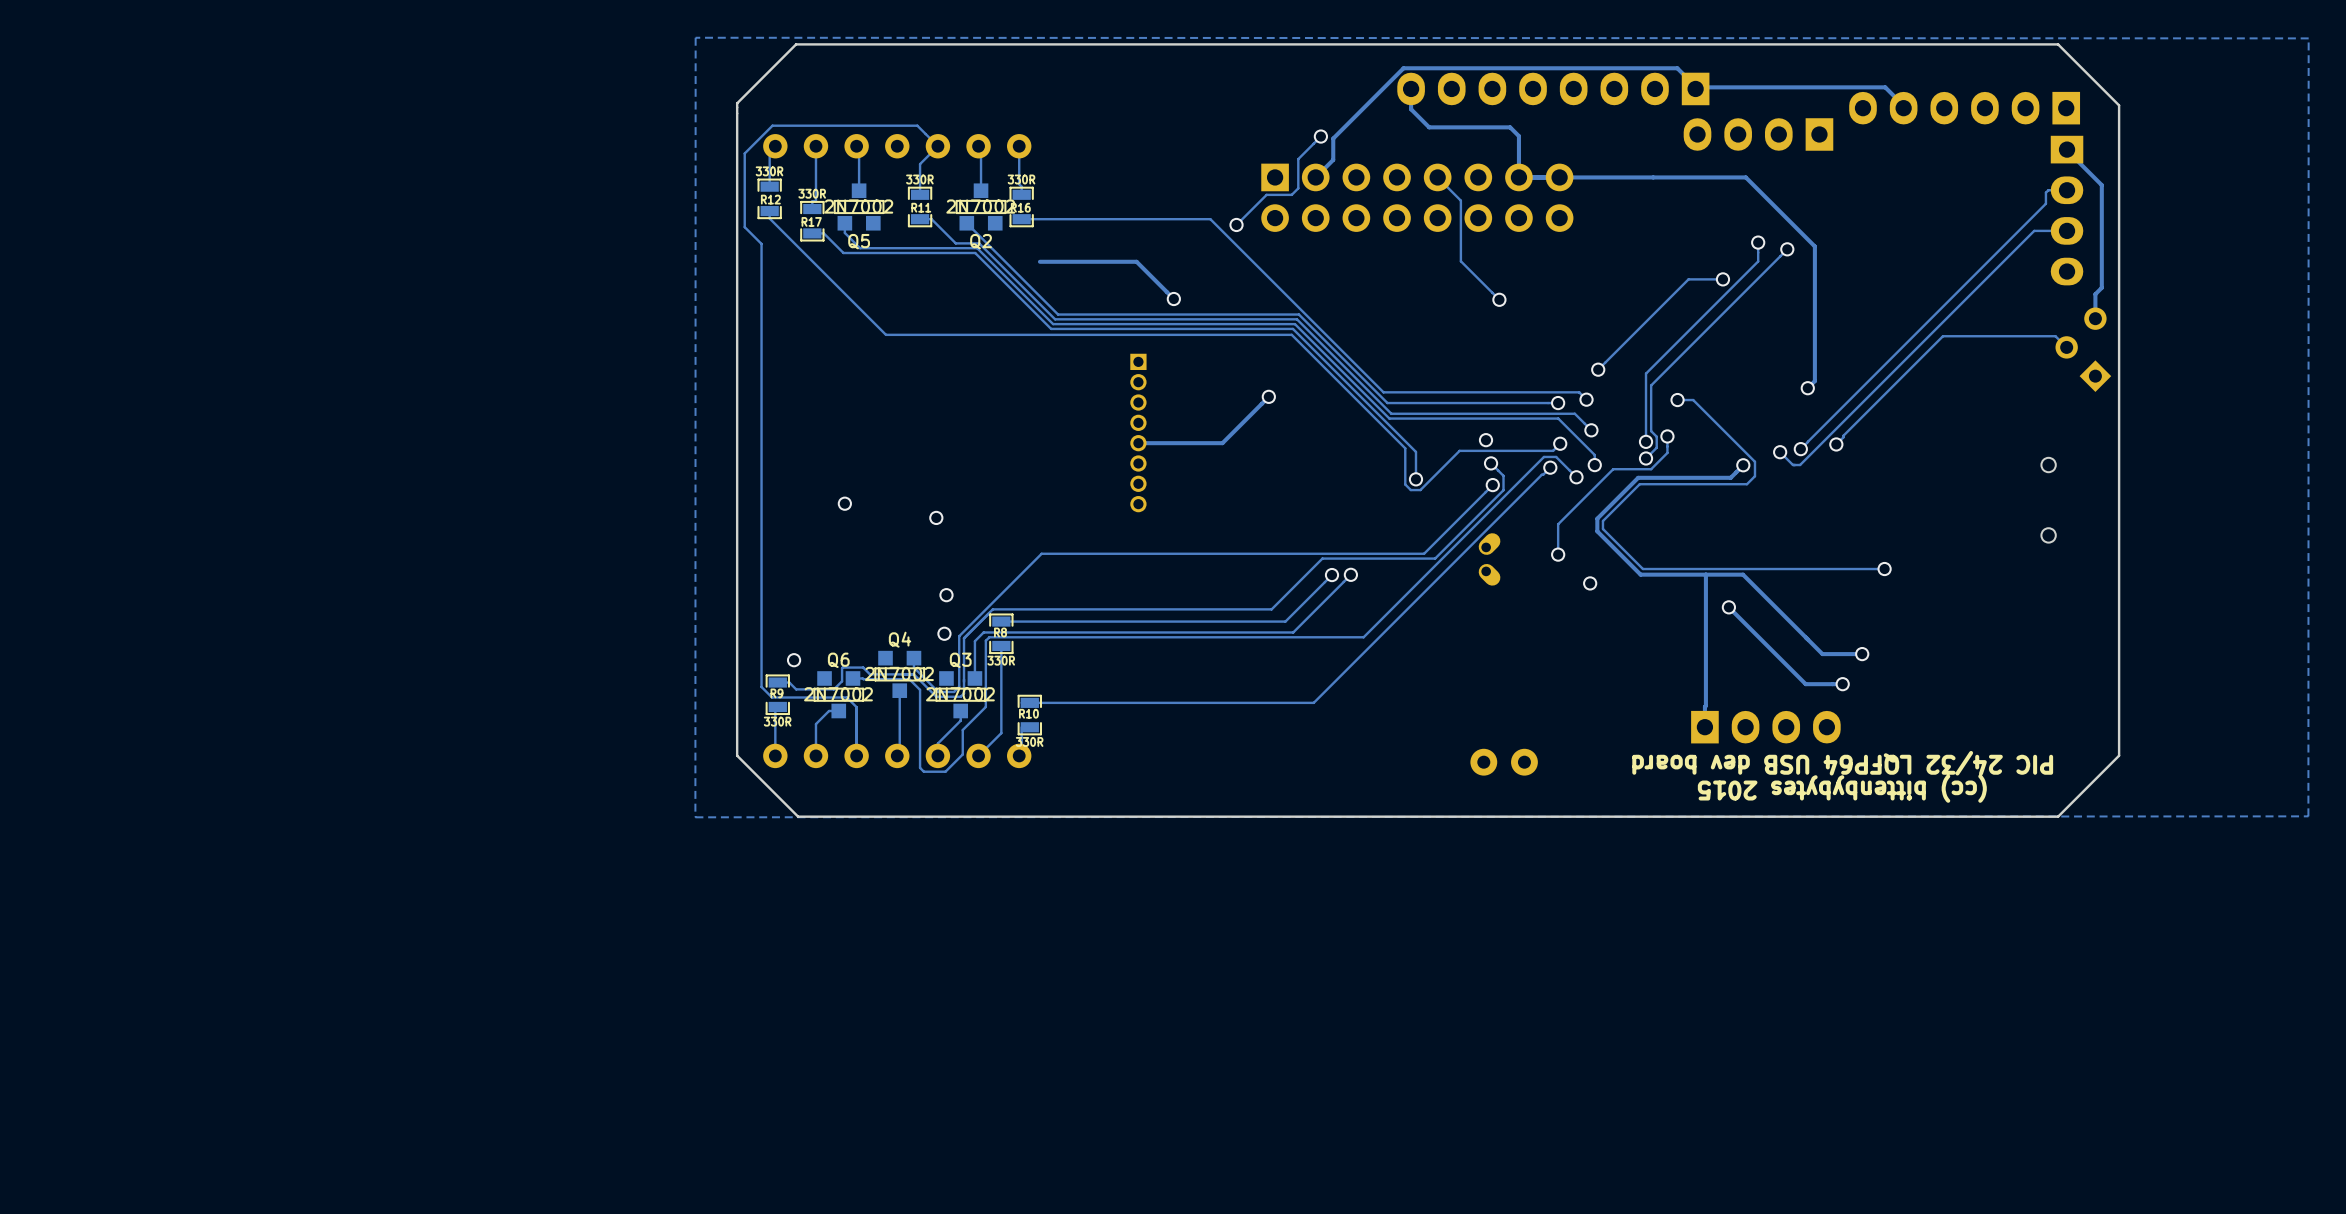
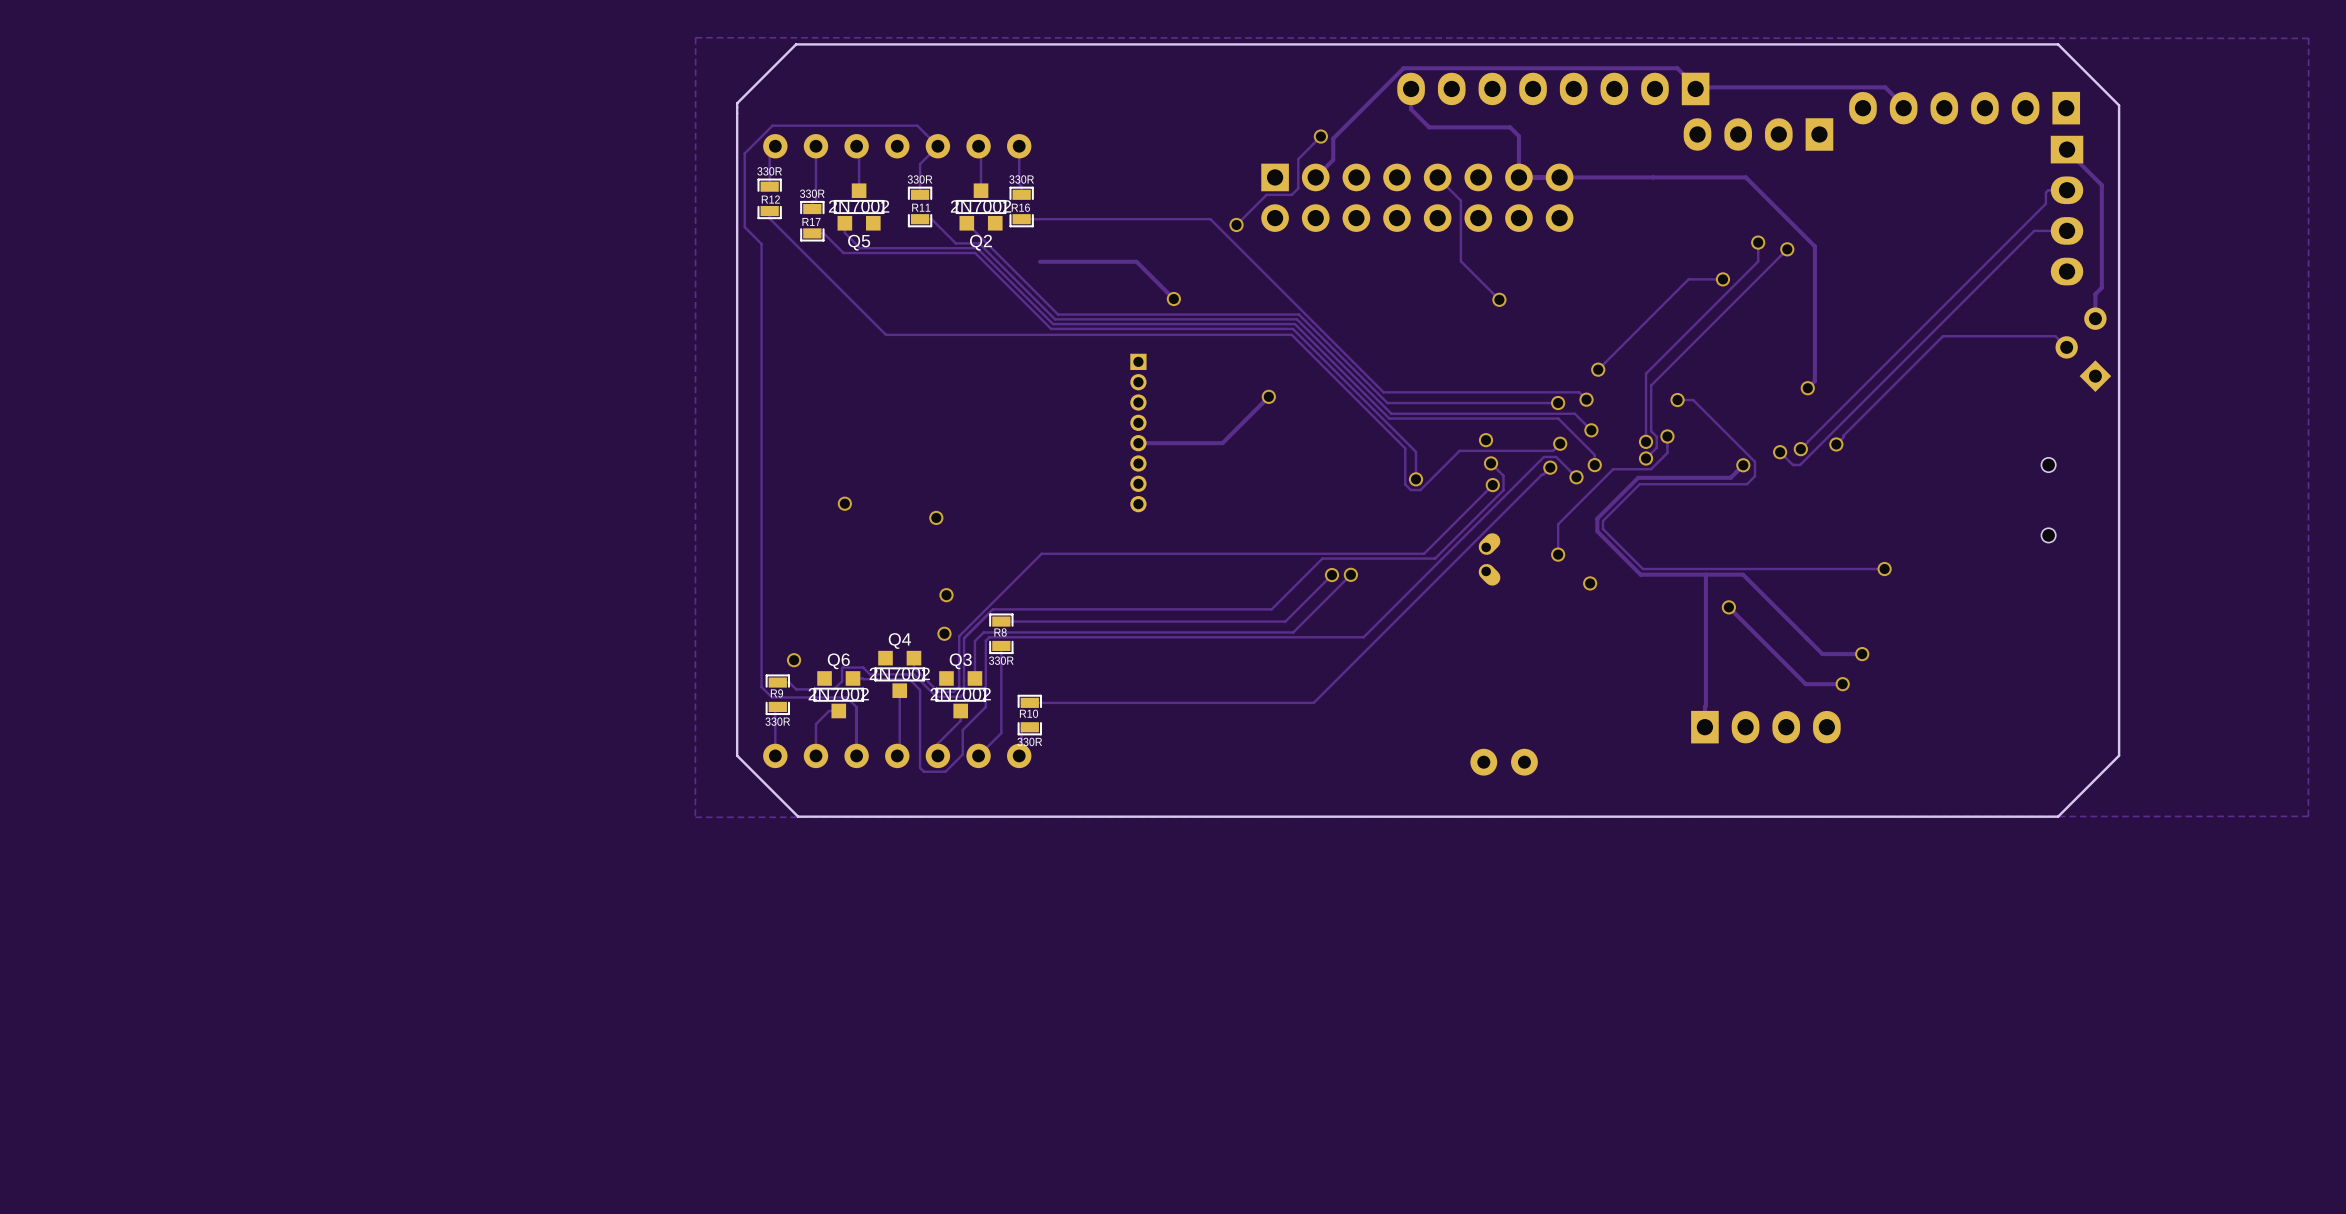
text: PIC 24/32 LQFP64 USB dev board (1842, 763) -> none
text: (cc) bittenbybytes 2015 (1842, 788) -> none

